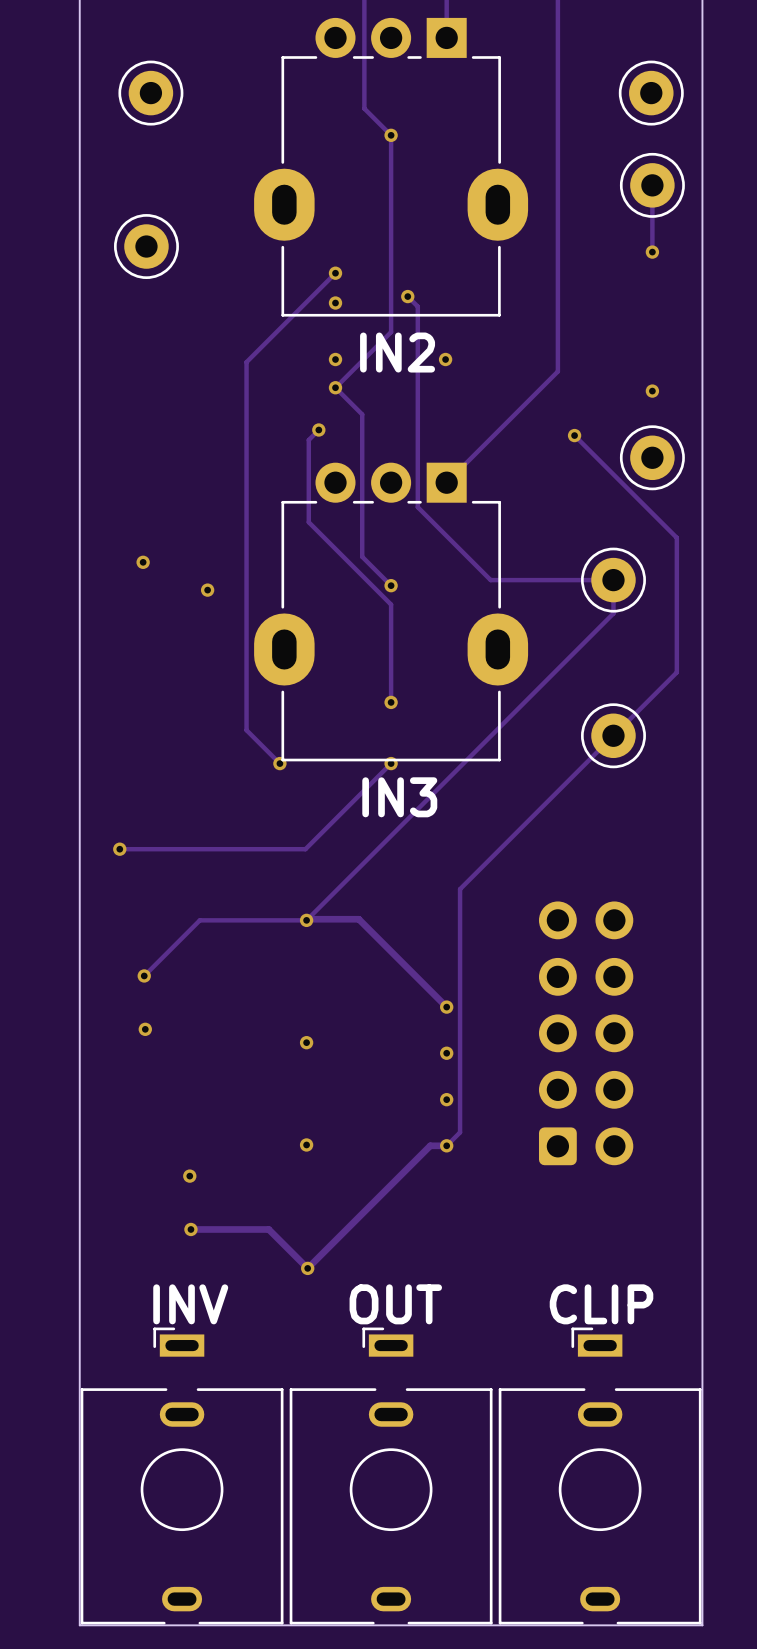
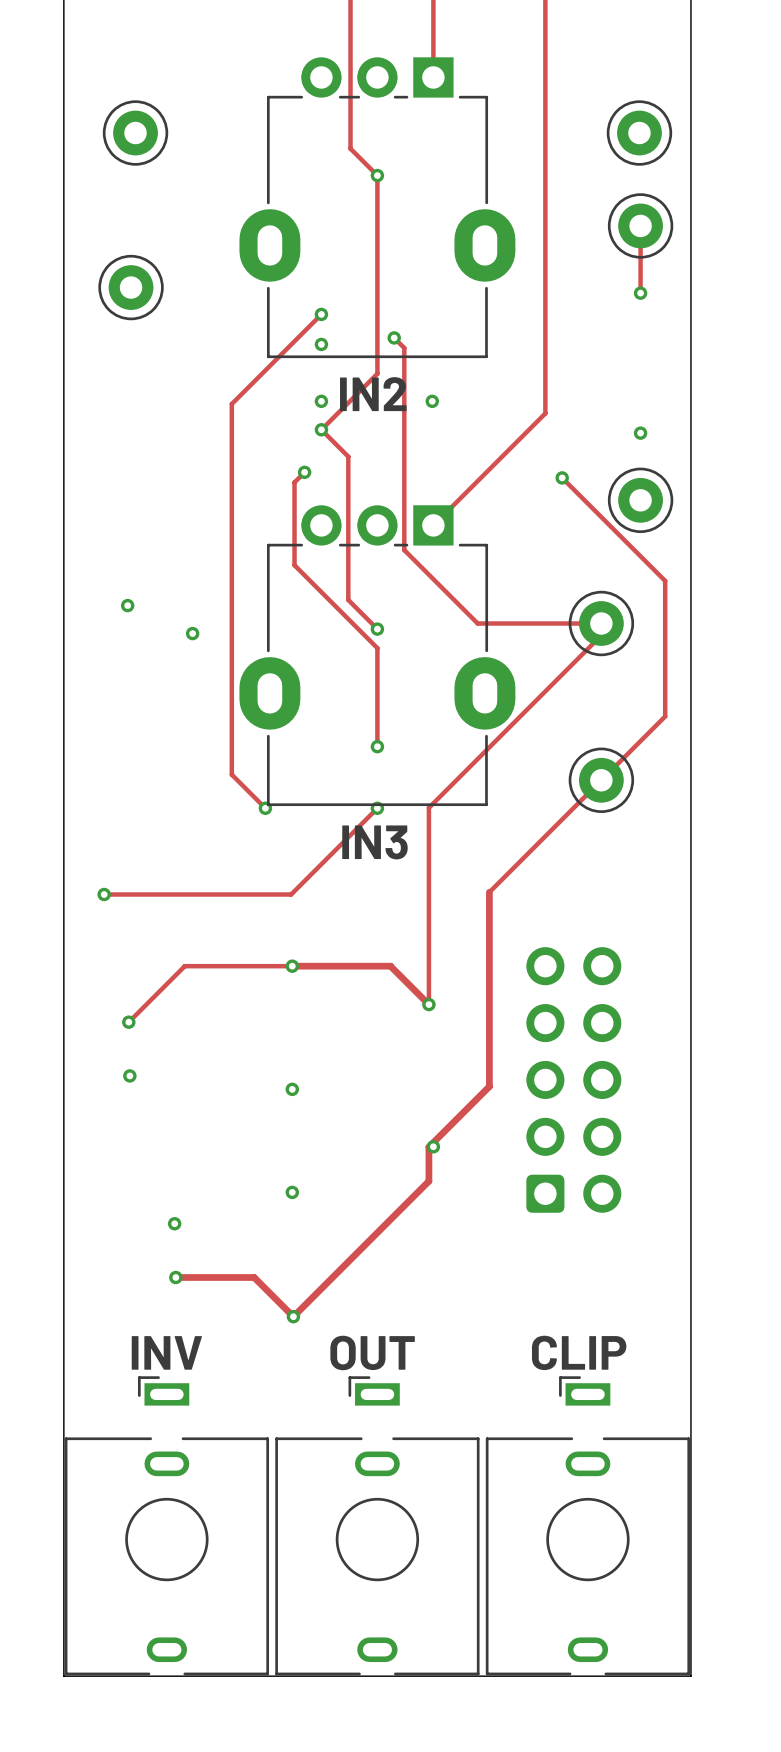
track: (613, 591) (613, 613) (307, 919) (358, 919) (446, 1007) -> (601, 635) (428, 807) (428, 1004) (390, 966) (292, 966)
track: (502, 846) (460, 889) (460, 1132) (446, 1145) (430, 1145) -> (489, 892) (489, 1086) (428, 1147) (428, 1181) (416, 1193)
via: none -> (428, 1004)
via: (446, 1007) -> none
via: (446, 1053) -> none
via: (446, 1145) -> none

